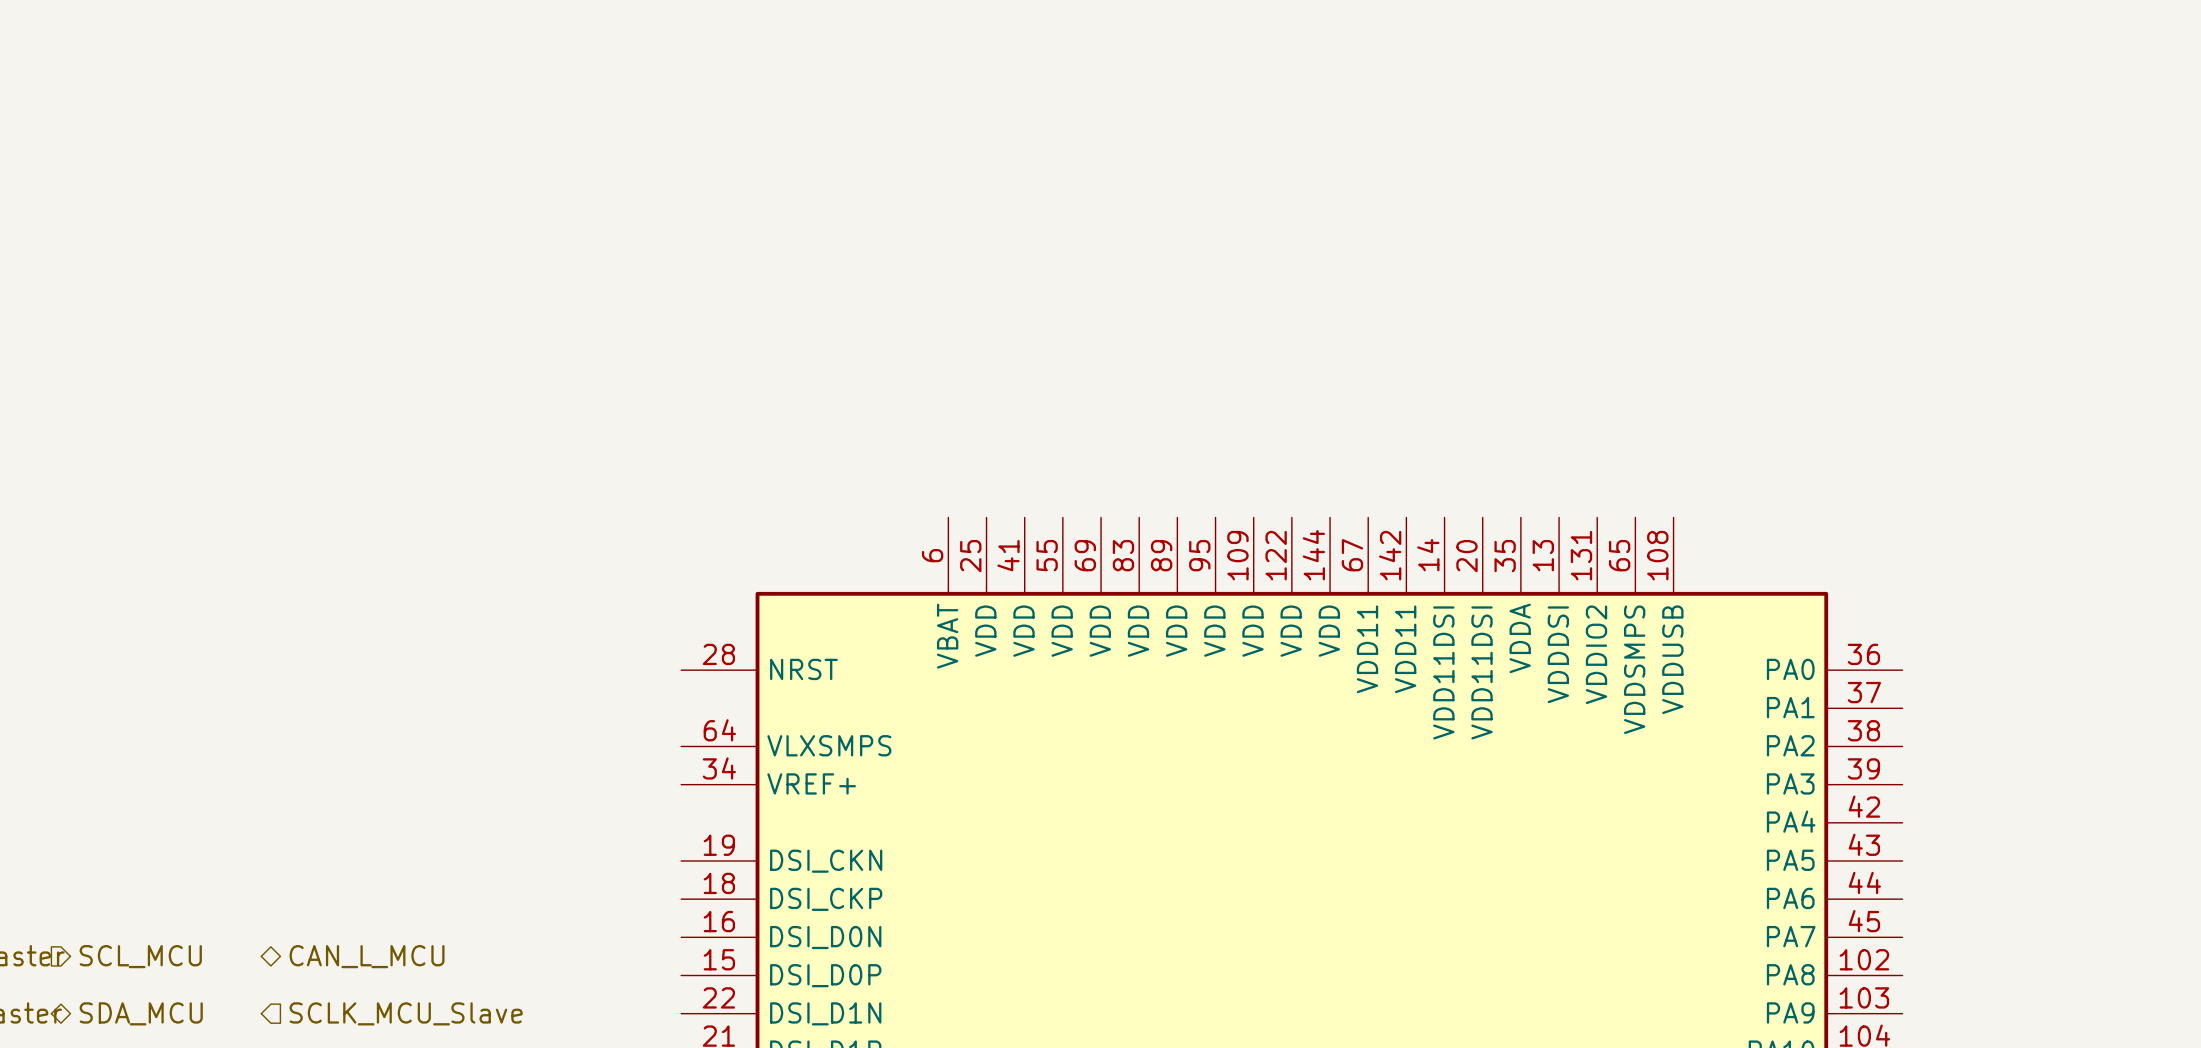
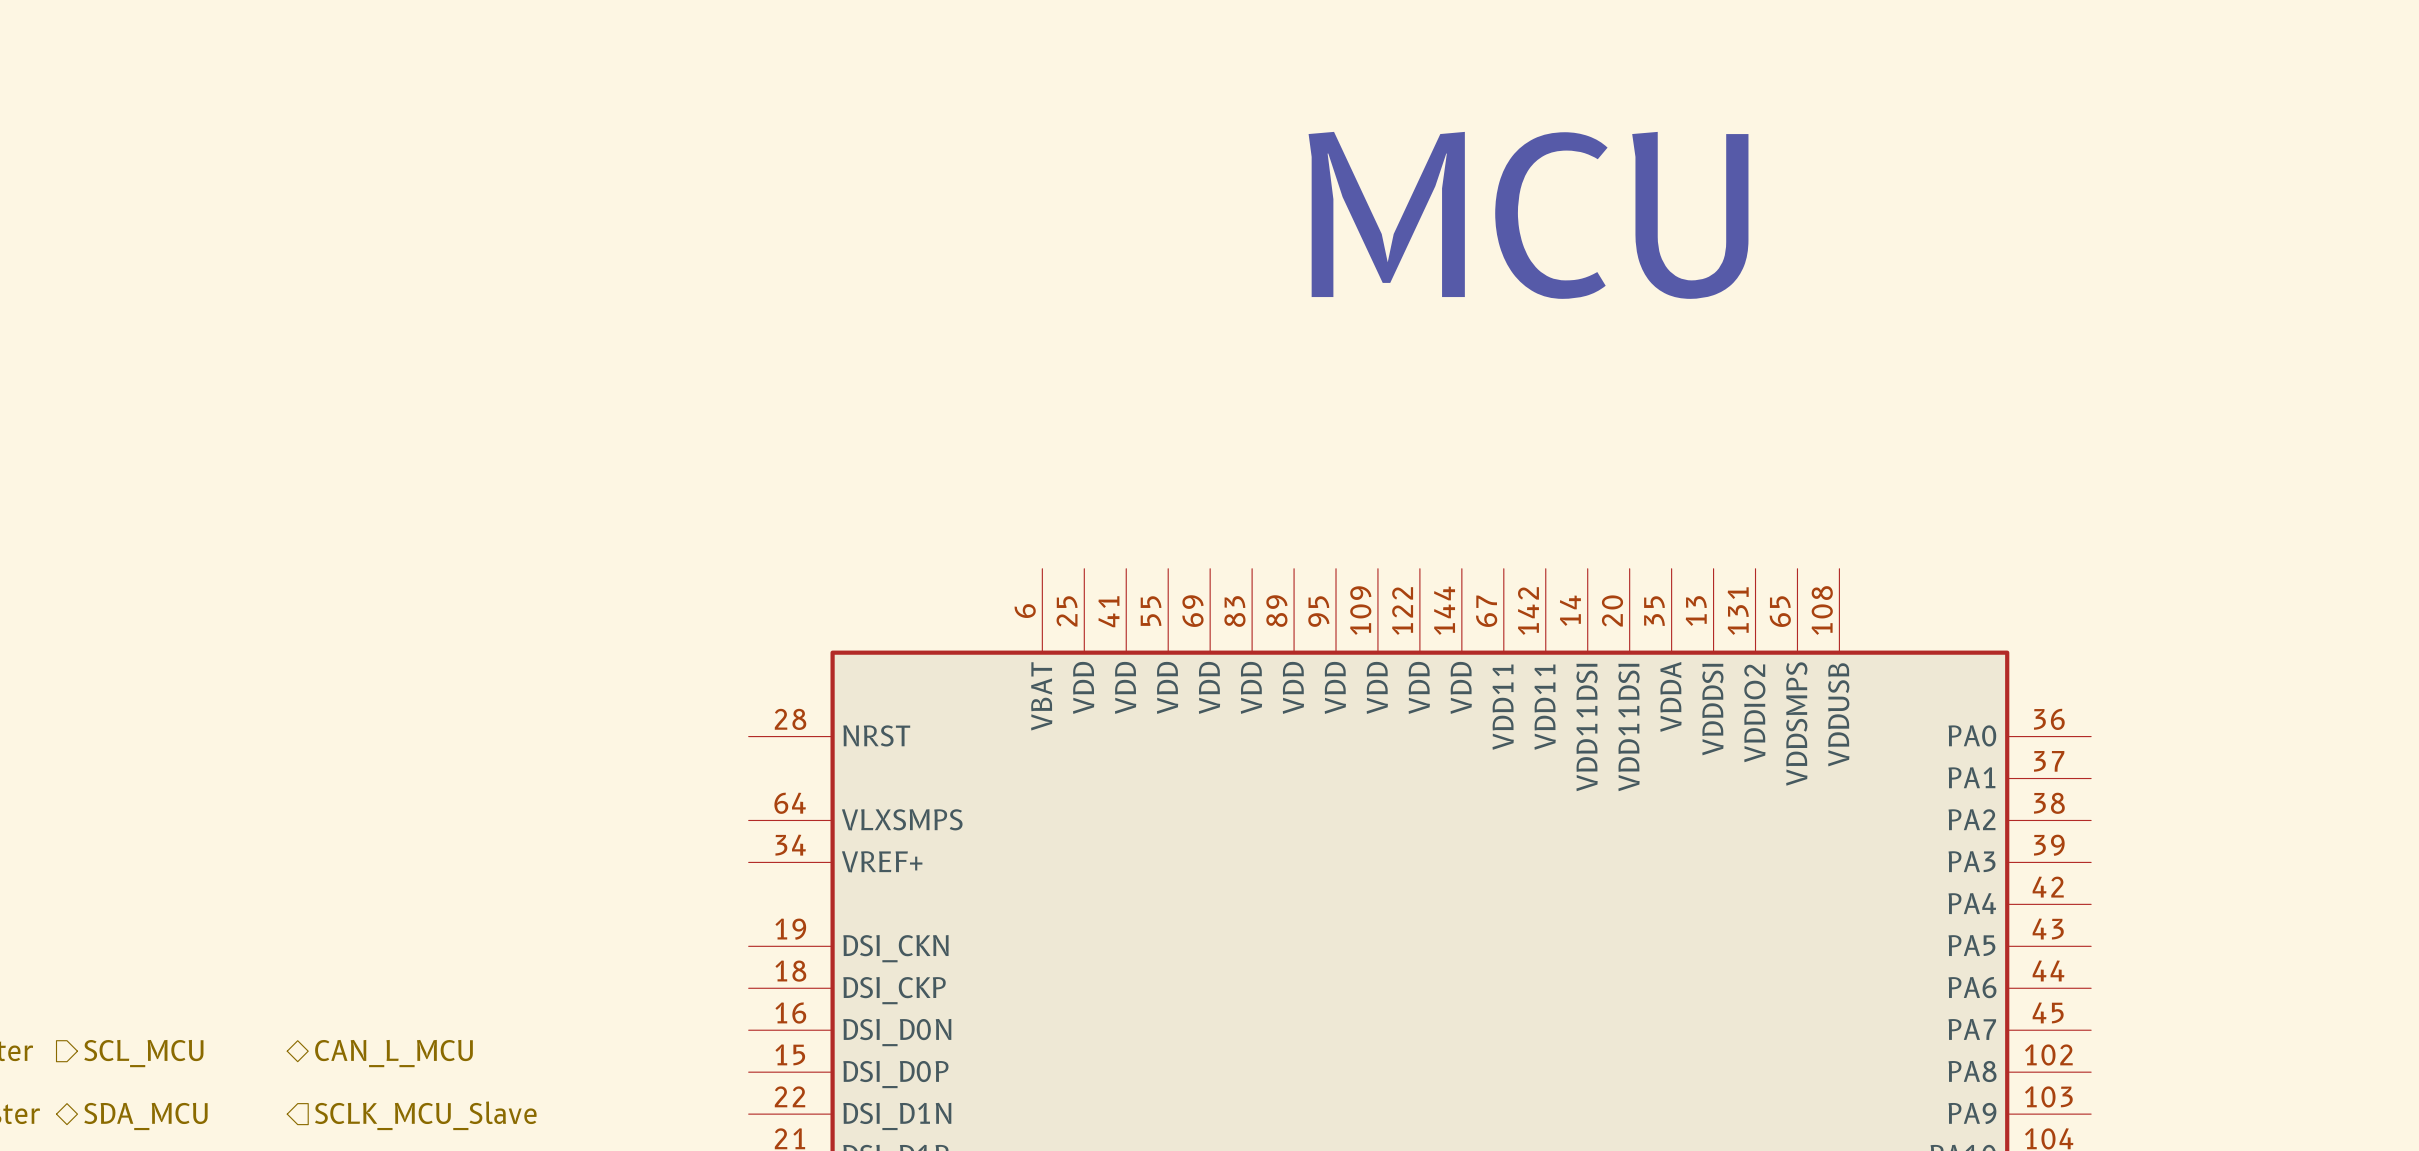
text: none -> MCU (1528, 215)

